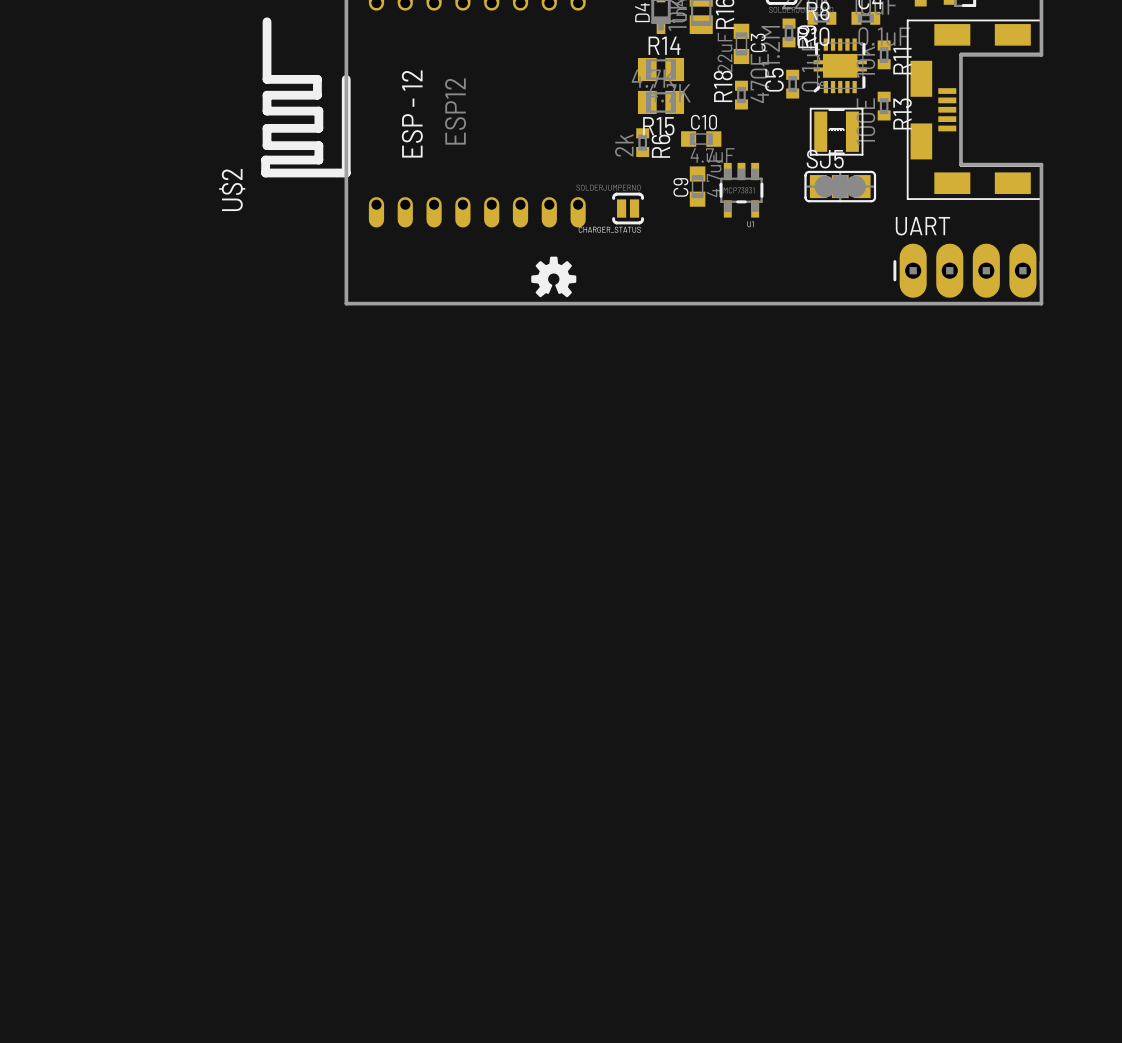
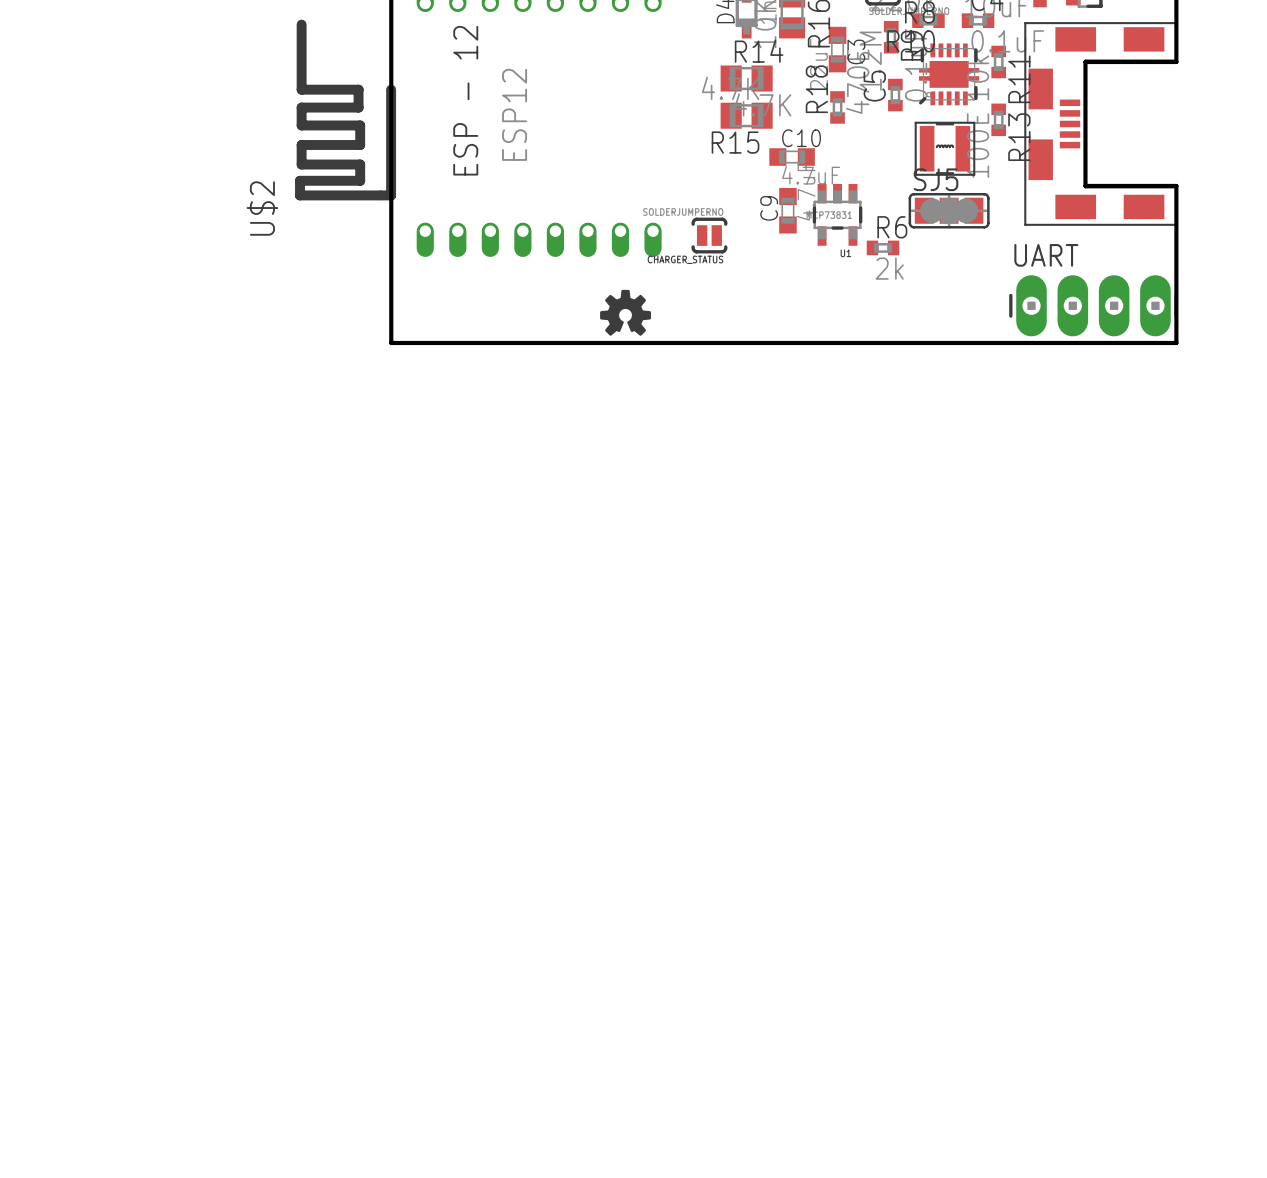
R6 rotation: 0° (642, 142) -> 90° clockwise (883, 247)
R6 position: (642, 142) -> (883, 247)
R6 name position: R6 (660, 146) -> R6 (892, 227)

